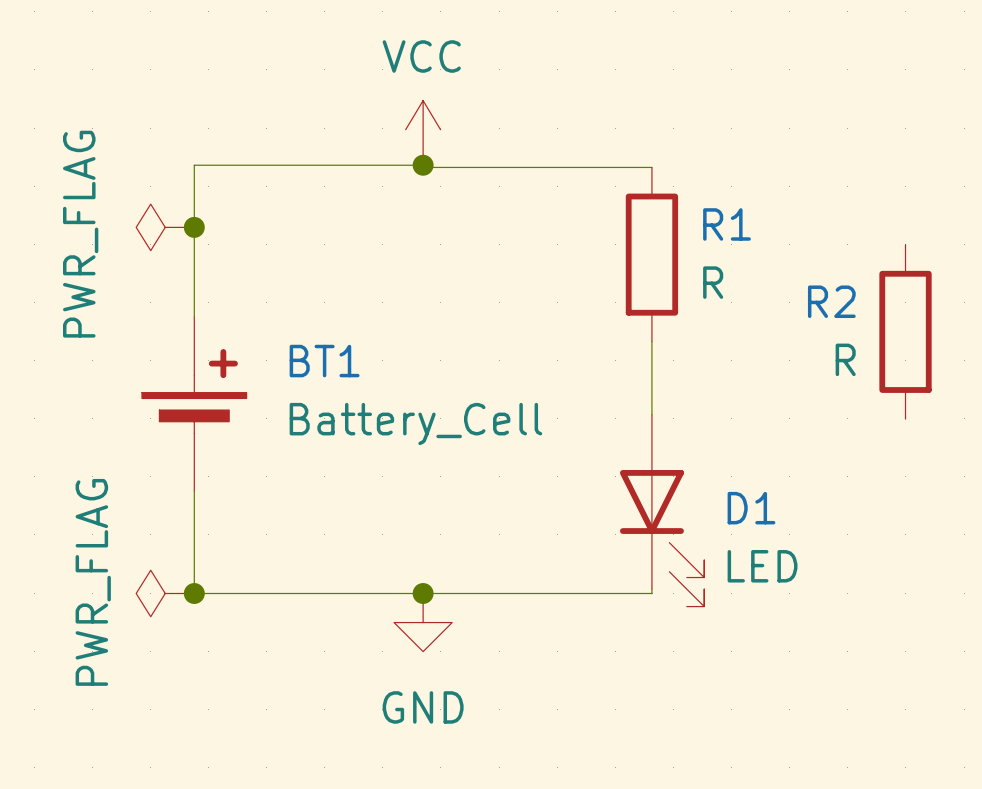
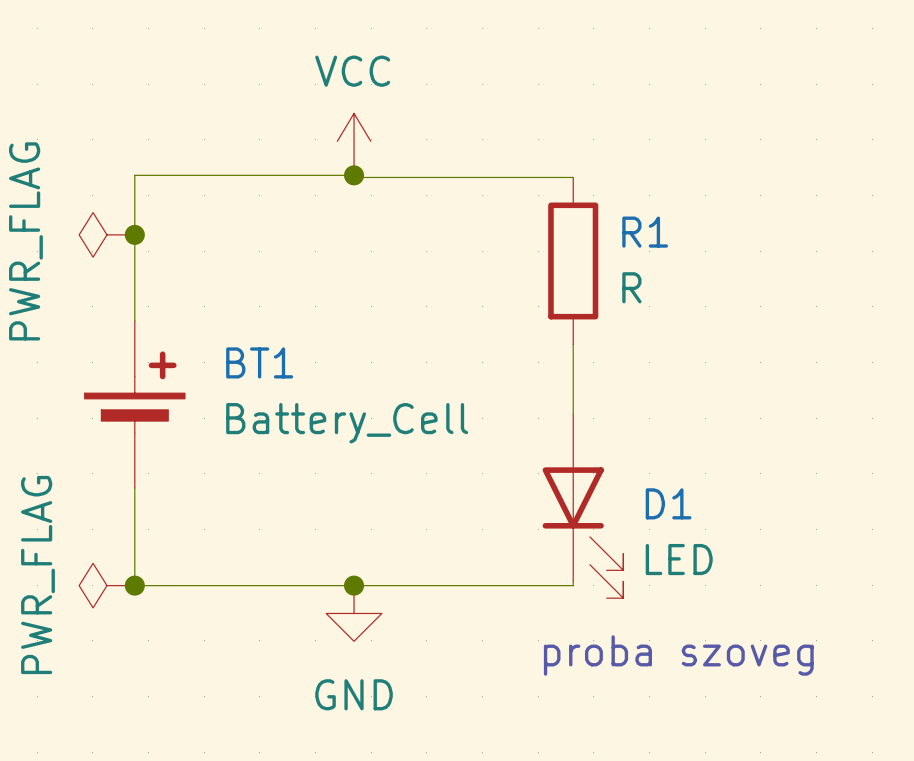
R2: R (905, 331) -> none
text: none -> proba szoveg (678, 655)

